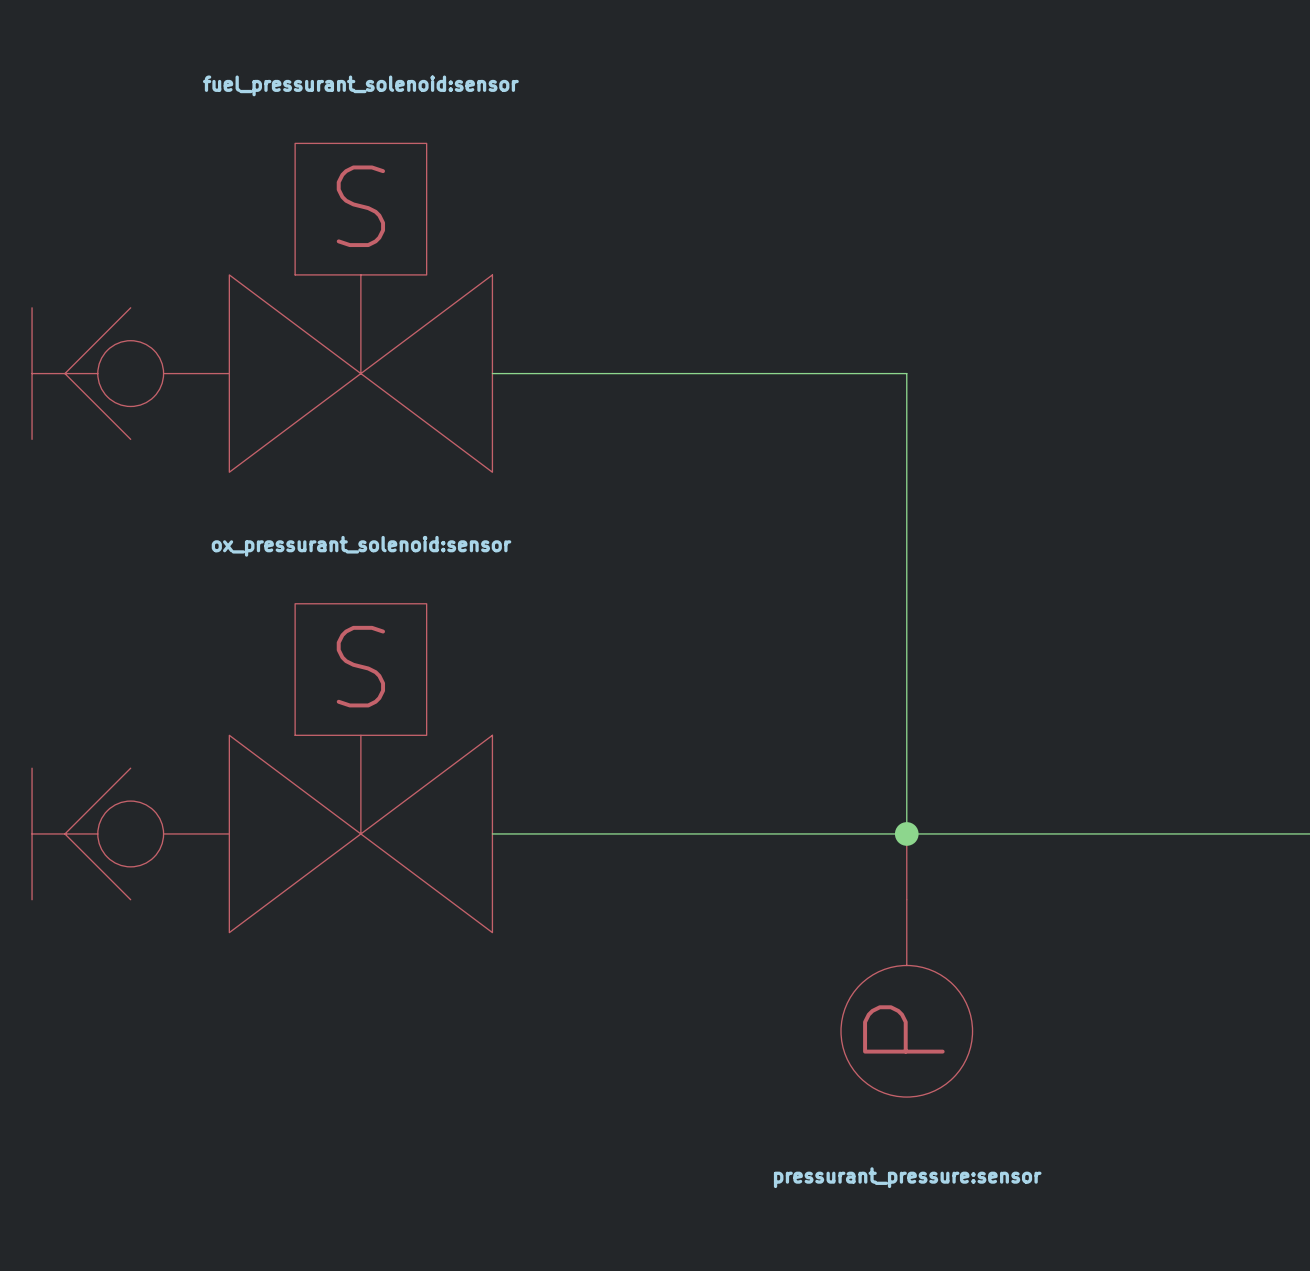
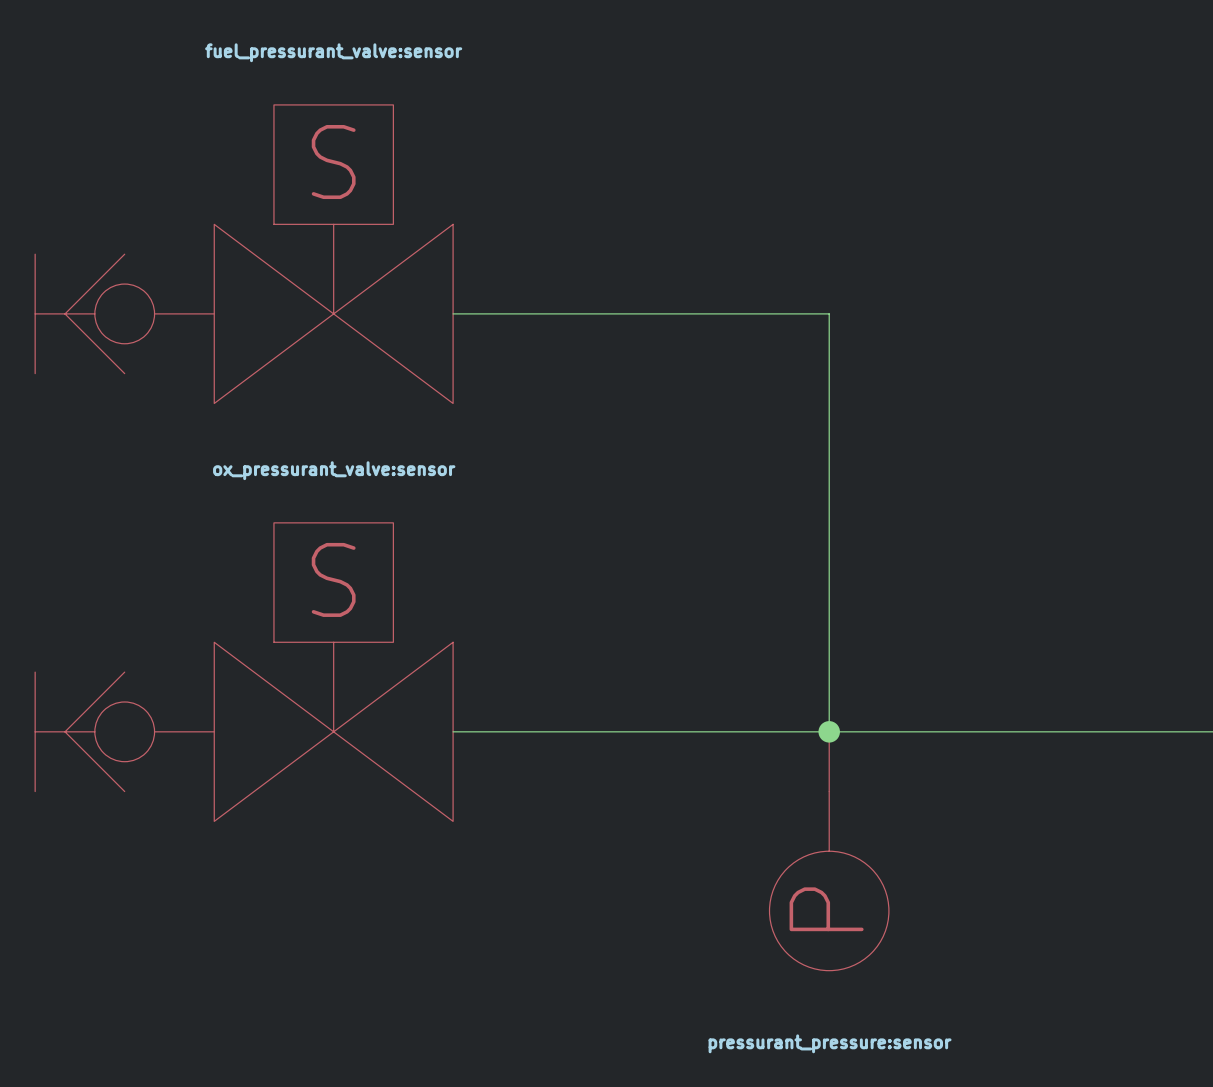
part value: fuel_pressurant_solenoid:sensor (360, 85) -> fuel_pressurant_valve:sensor (333, 52)
part value: ox_pressurant_solenoid:sensor (361, 546) -> ox_pressurant_valve:sensor (334, 470)

